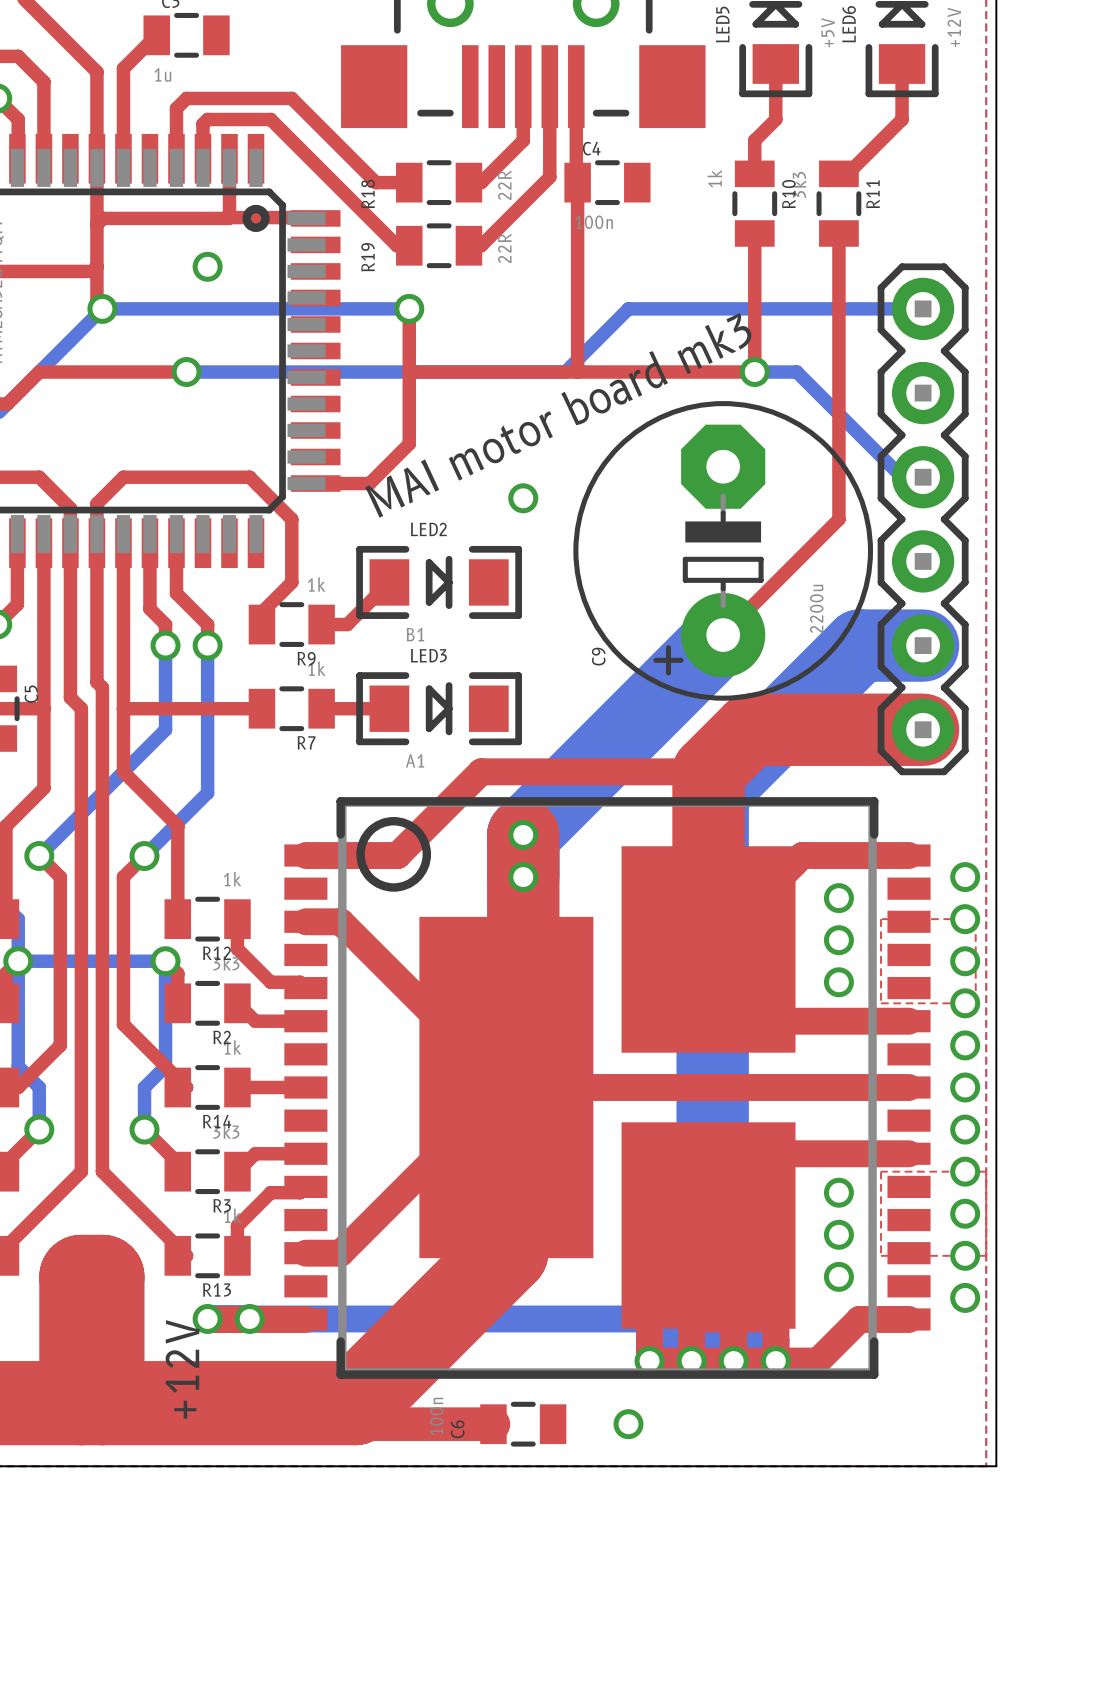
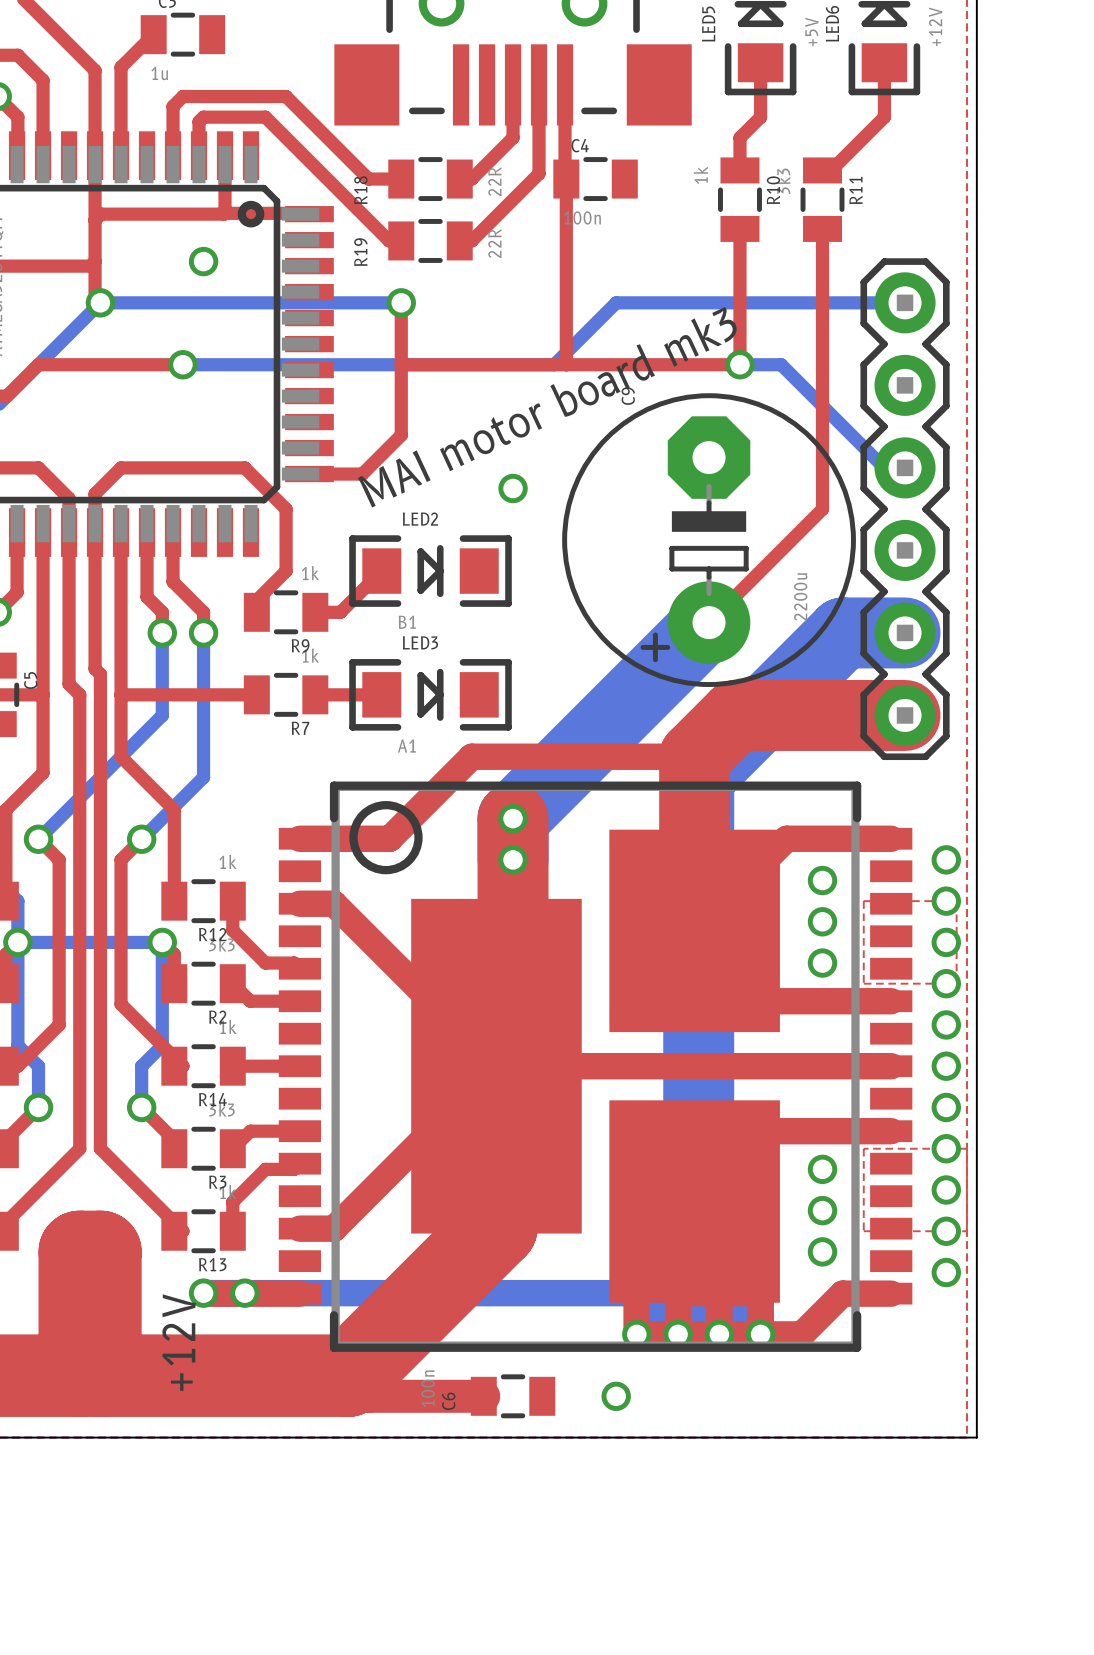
C9 name position: C9 (598, 656) -> C9 (628, 396)

